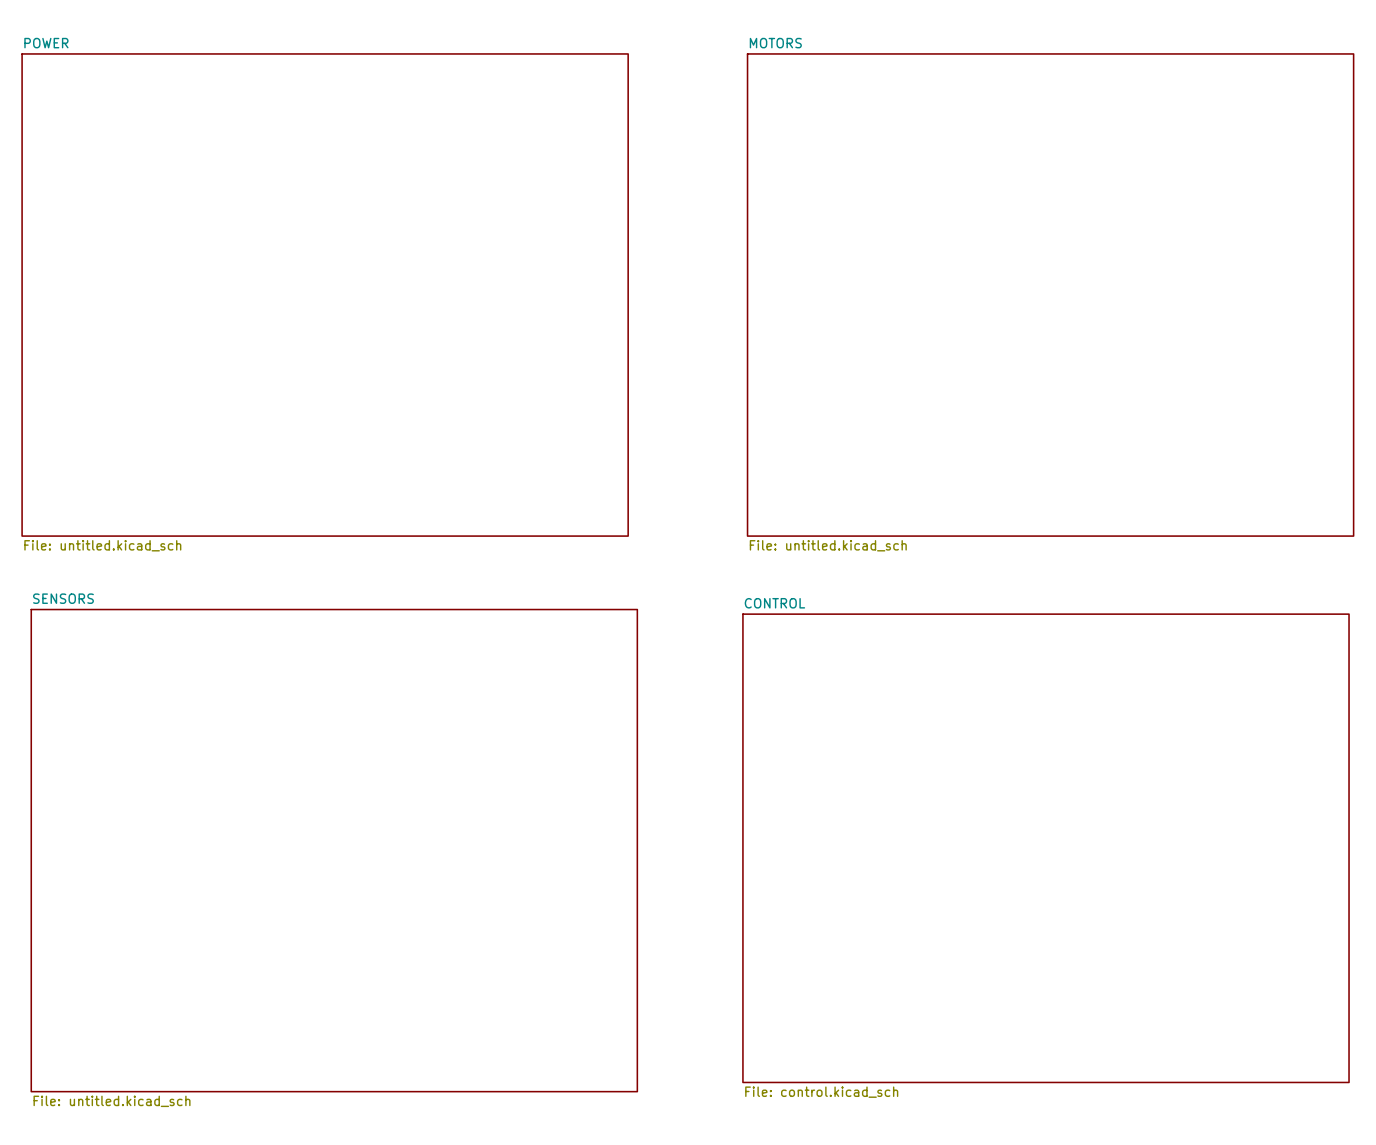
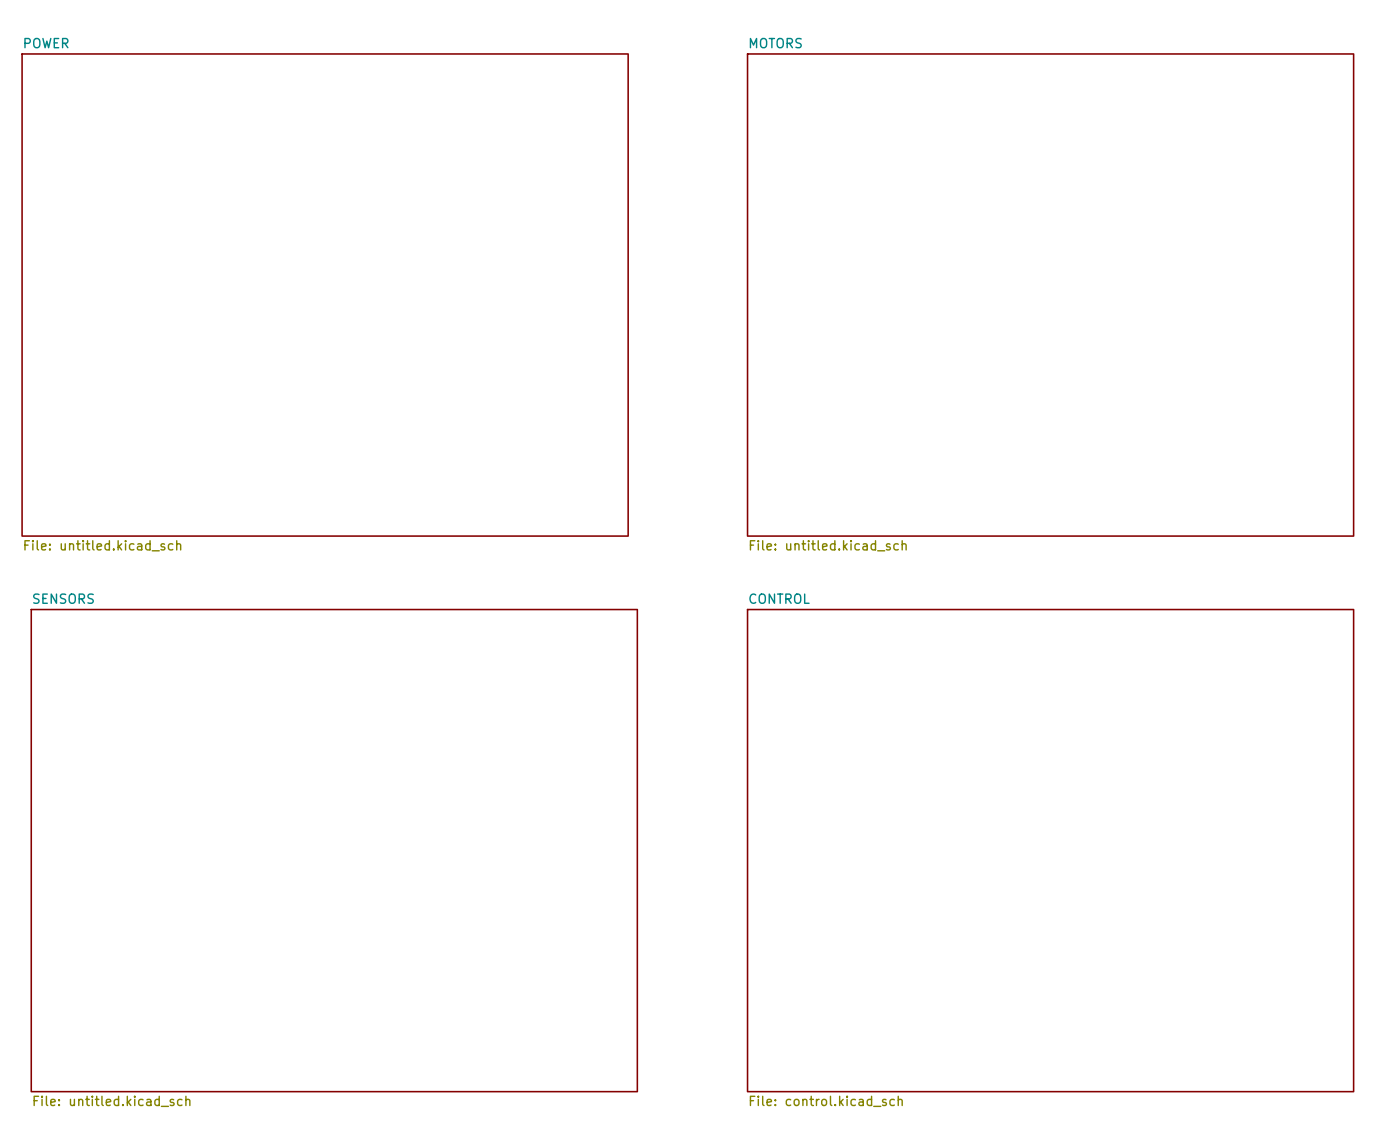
sheet CONTROL shape: [742, 613, 1350, 1084] -> [746, 608, 1355, 1093]

